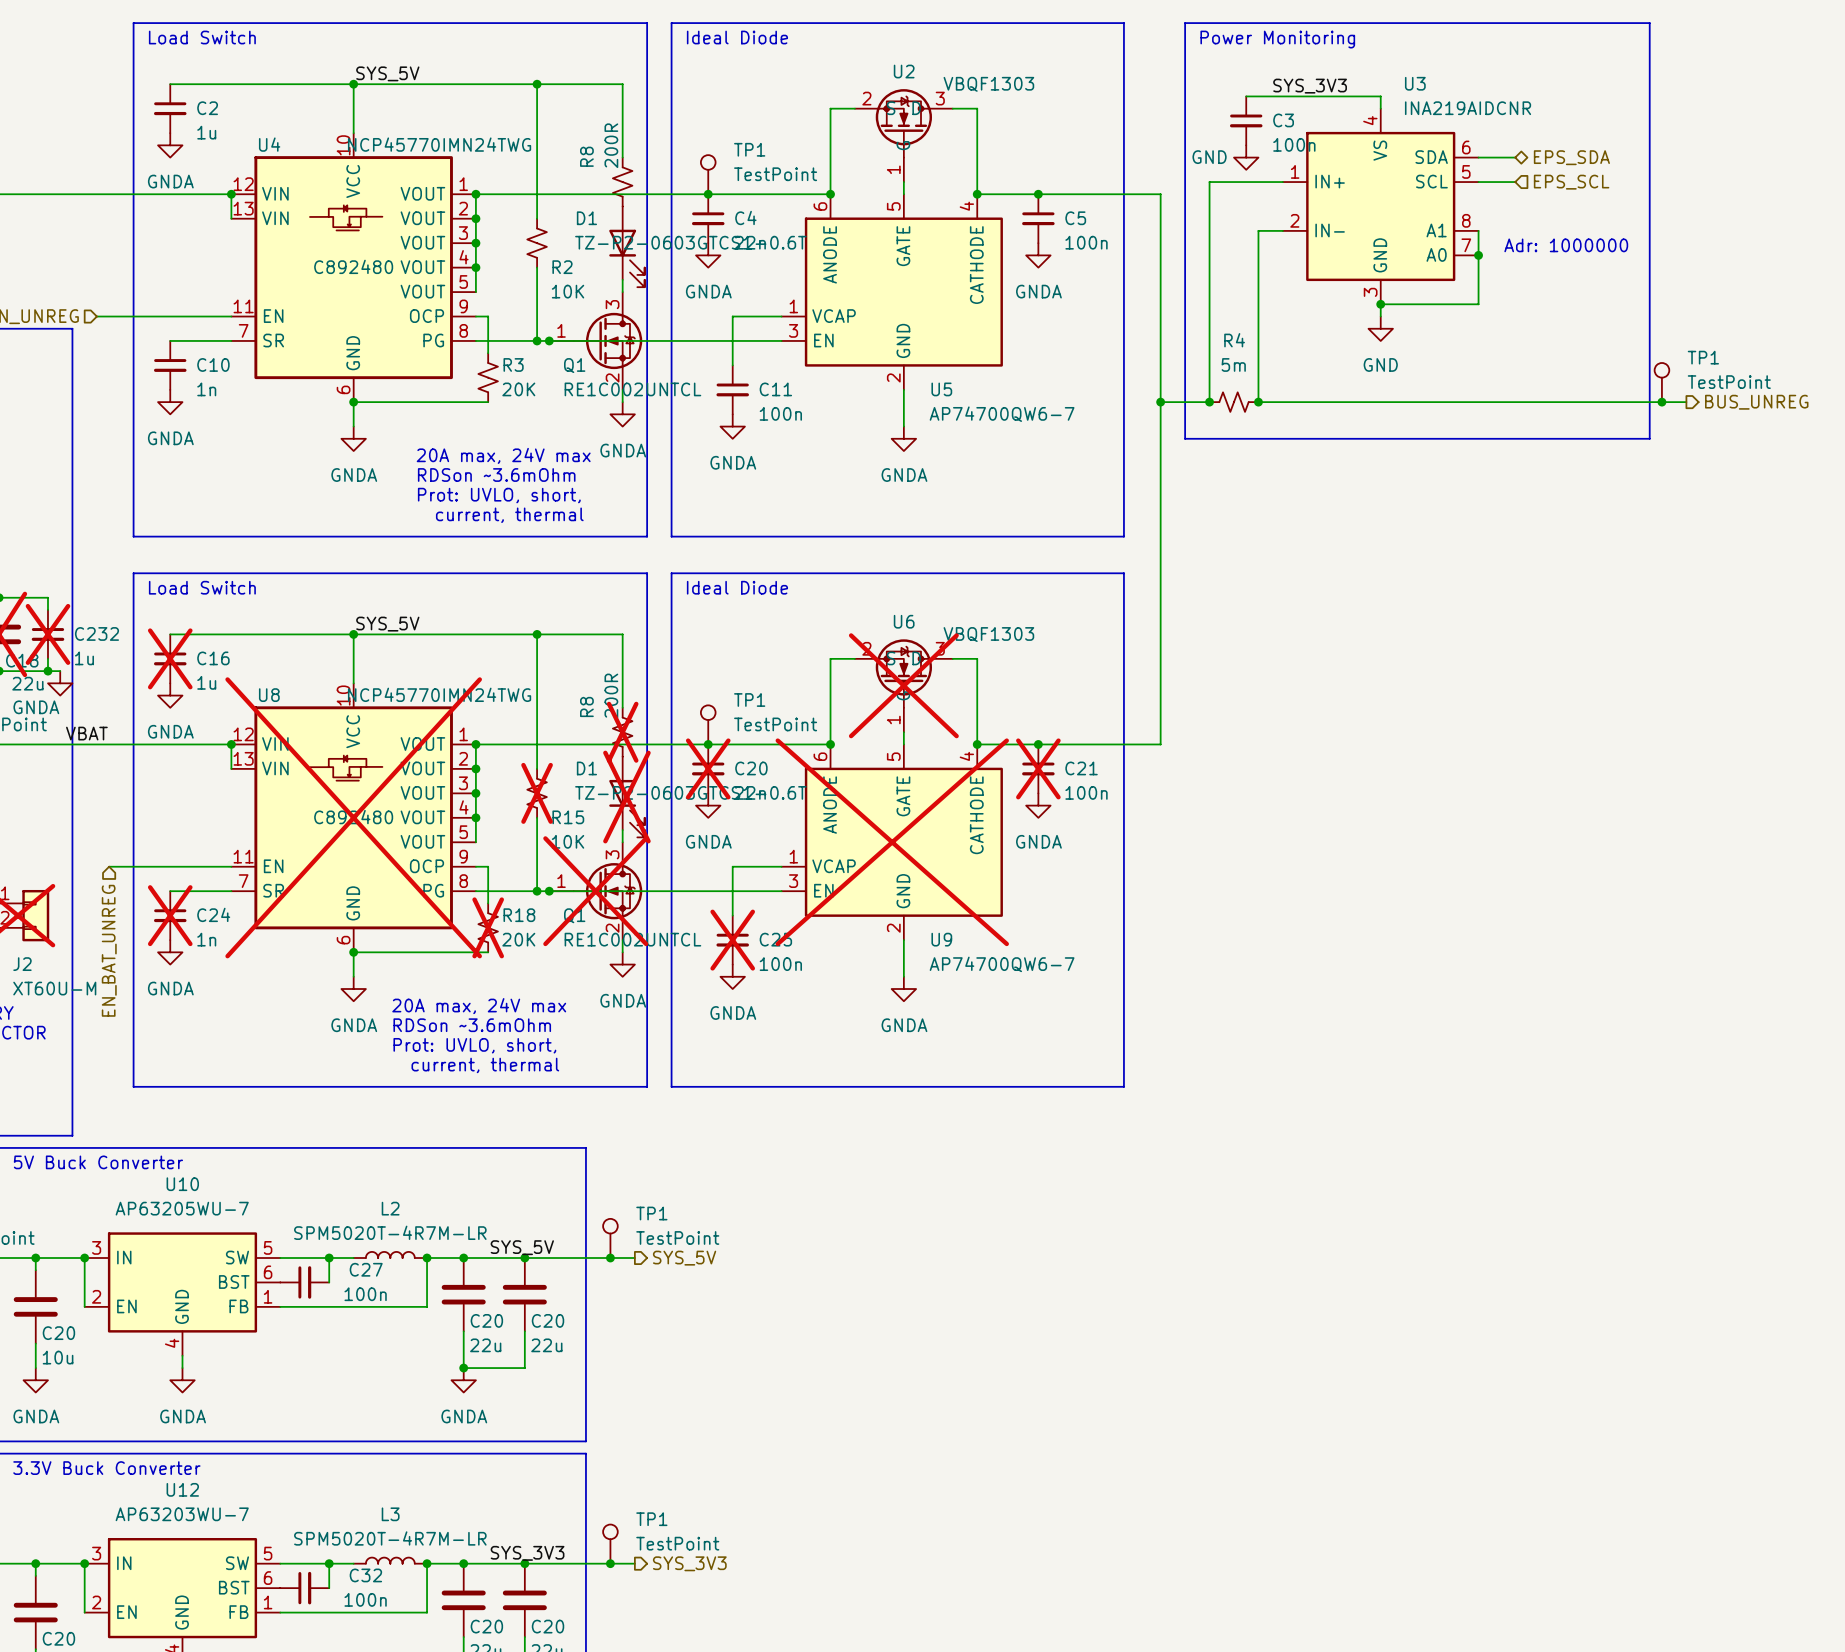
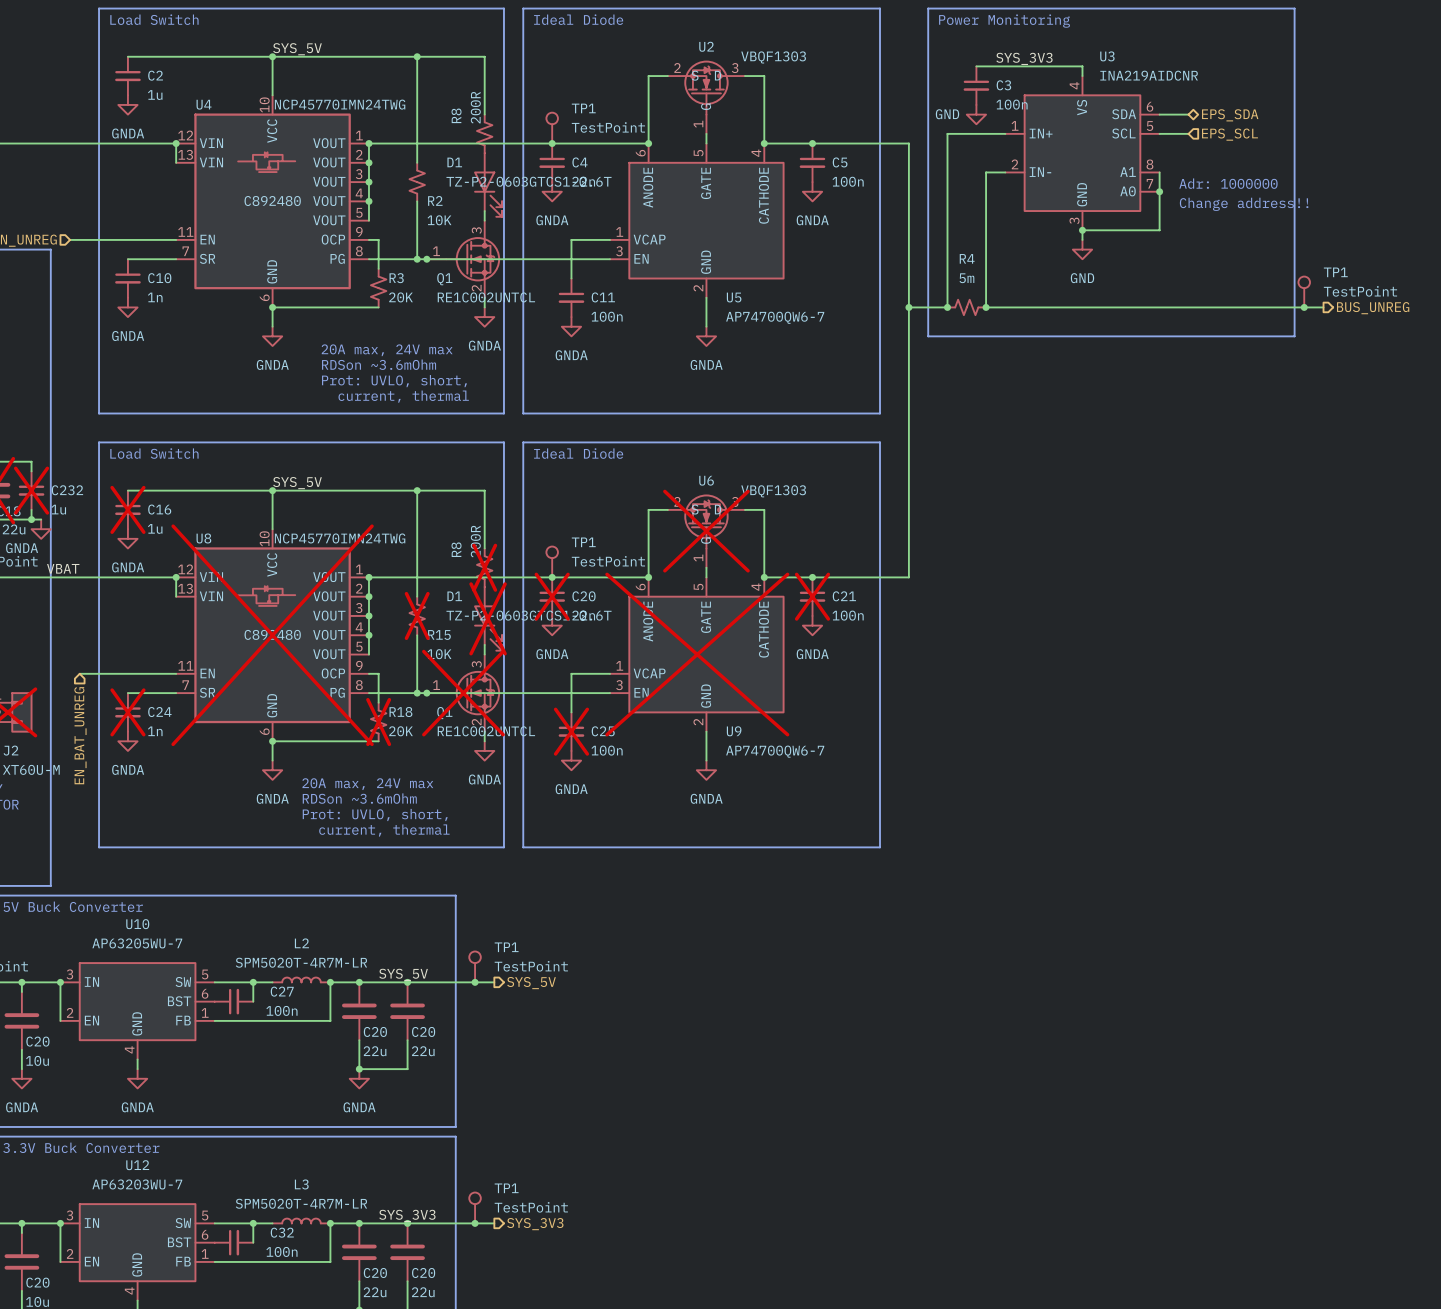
text: none -> Change address!! (1244, 204)

